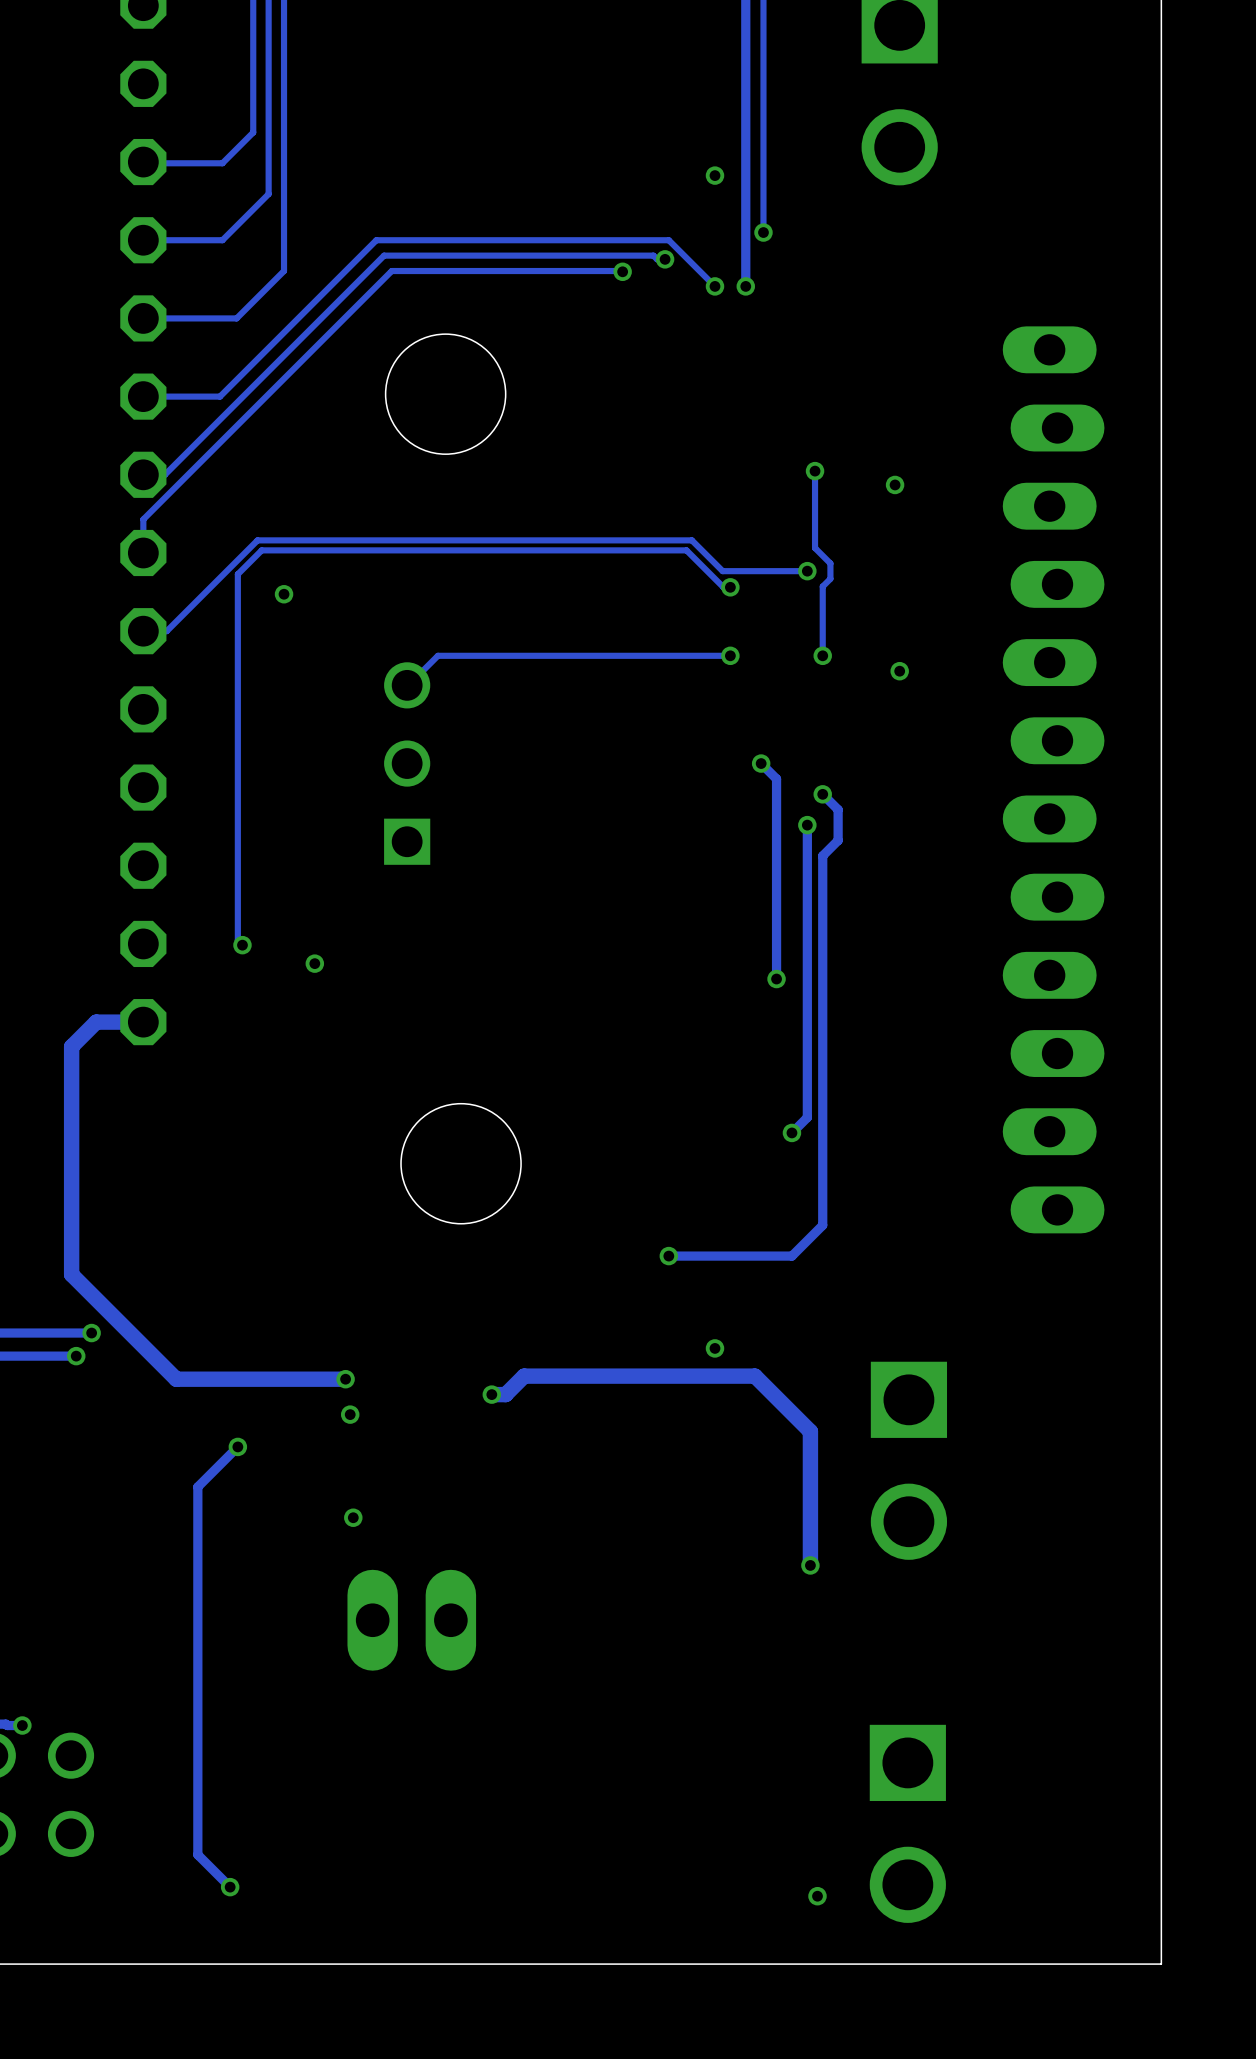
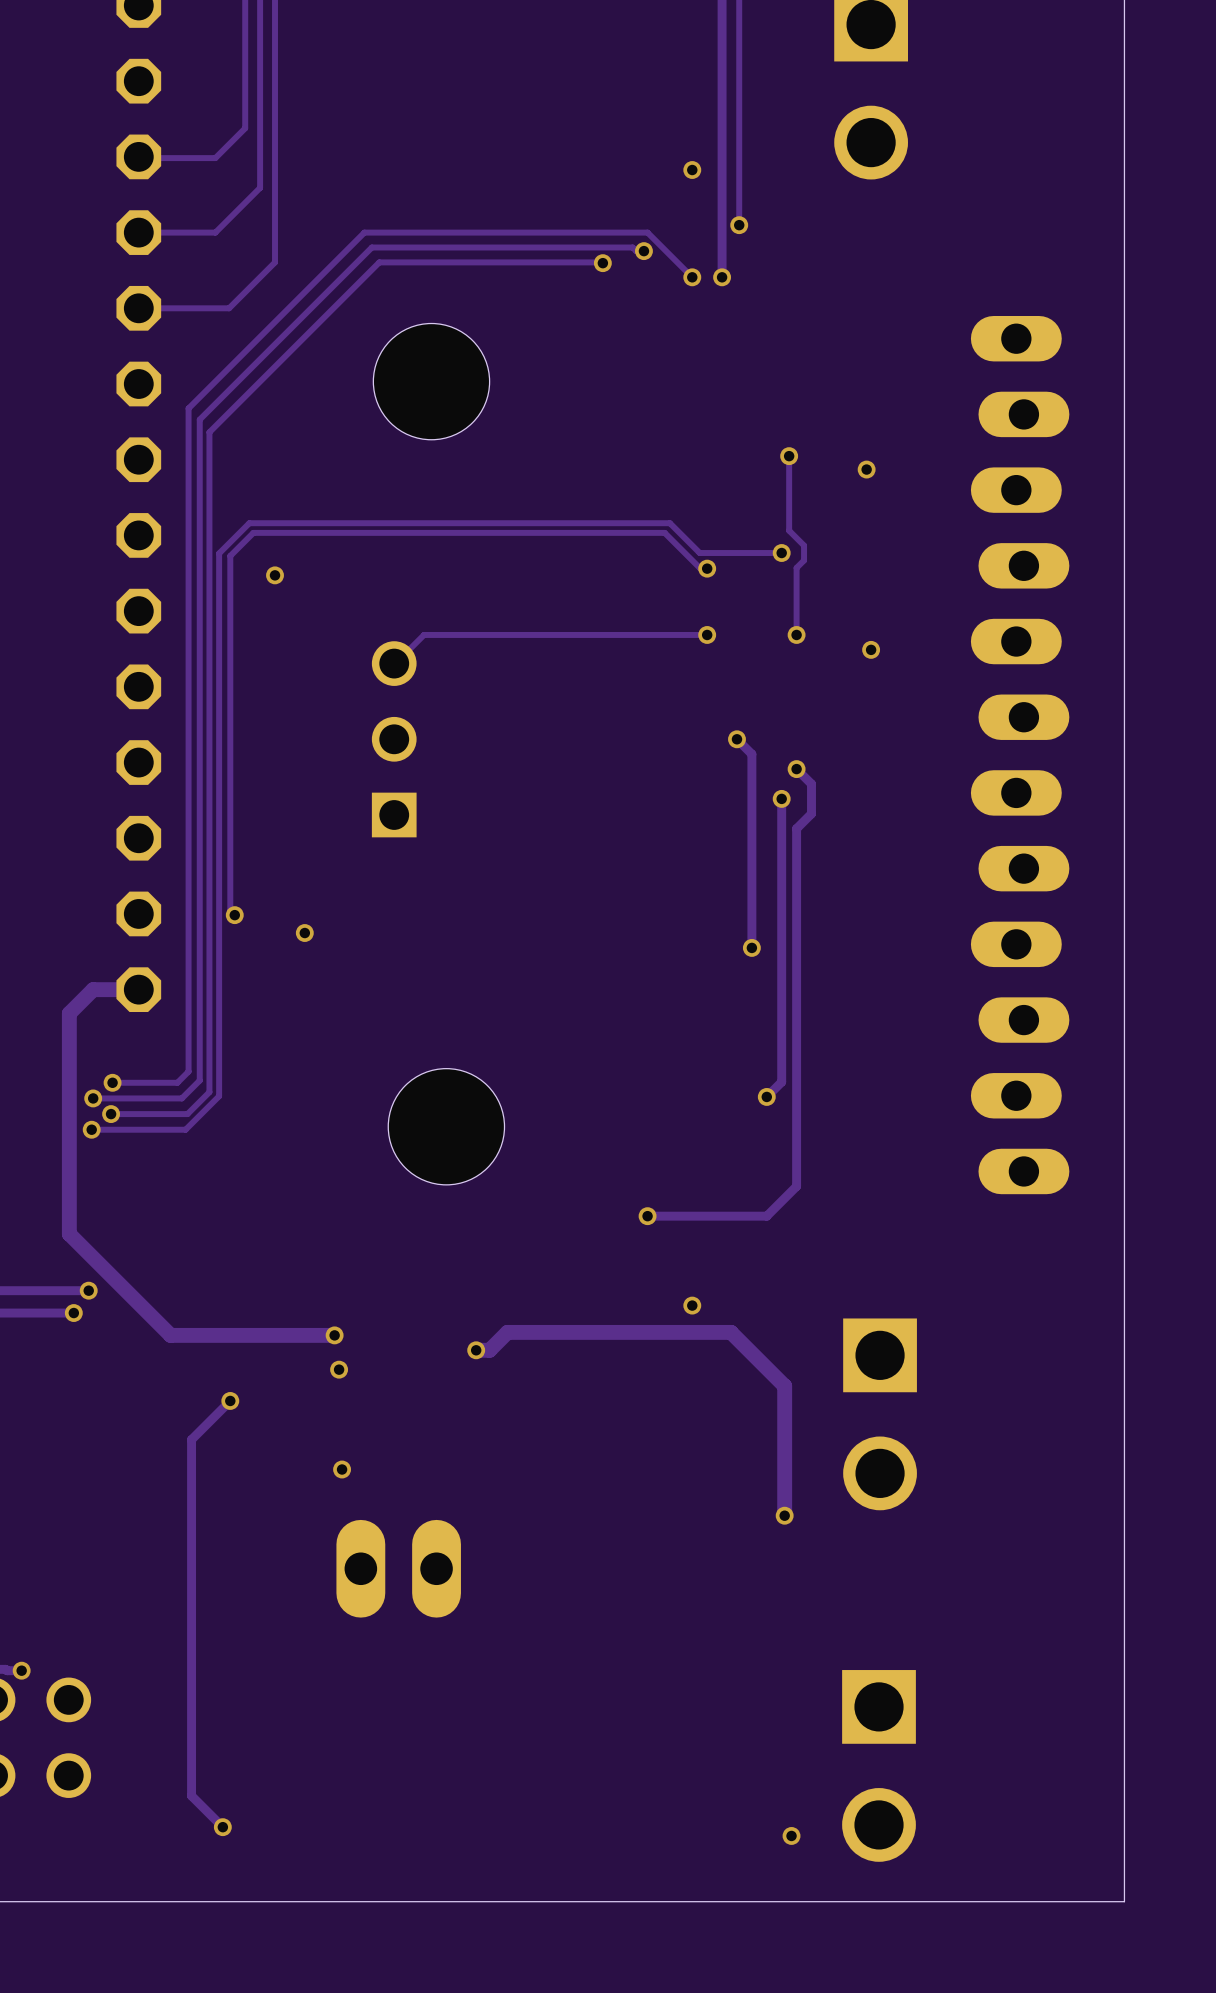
track: (220, 396) (143, 396) -> (213, 384) (188, 408) (188, 1071) (177, 1082) (112, 1082)
track: (206, 433) (164, 474) (143, 474) -> (199, 419) (199, 1080) (181, 1098) (93, 1098)
track: (216, 446) (143, 519) (143, 552) -> (209, 432) (209, 1092) (187, 1114) (111, 1114)
track: (226, 571) (166, 631) (143, 631) -> (219, 553) (219, 1096) (185, 1129) (91, 1129)
via: none -> (112, 1082)
via: none -> (93, 1098)
via: none -> (111, 1114)
via: none -> (91, 1129)

